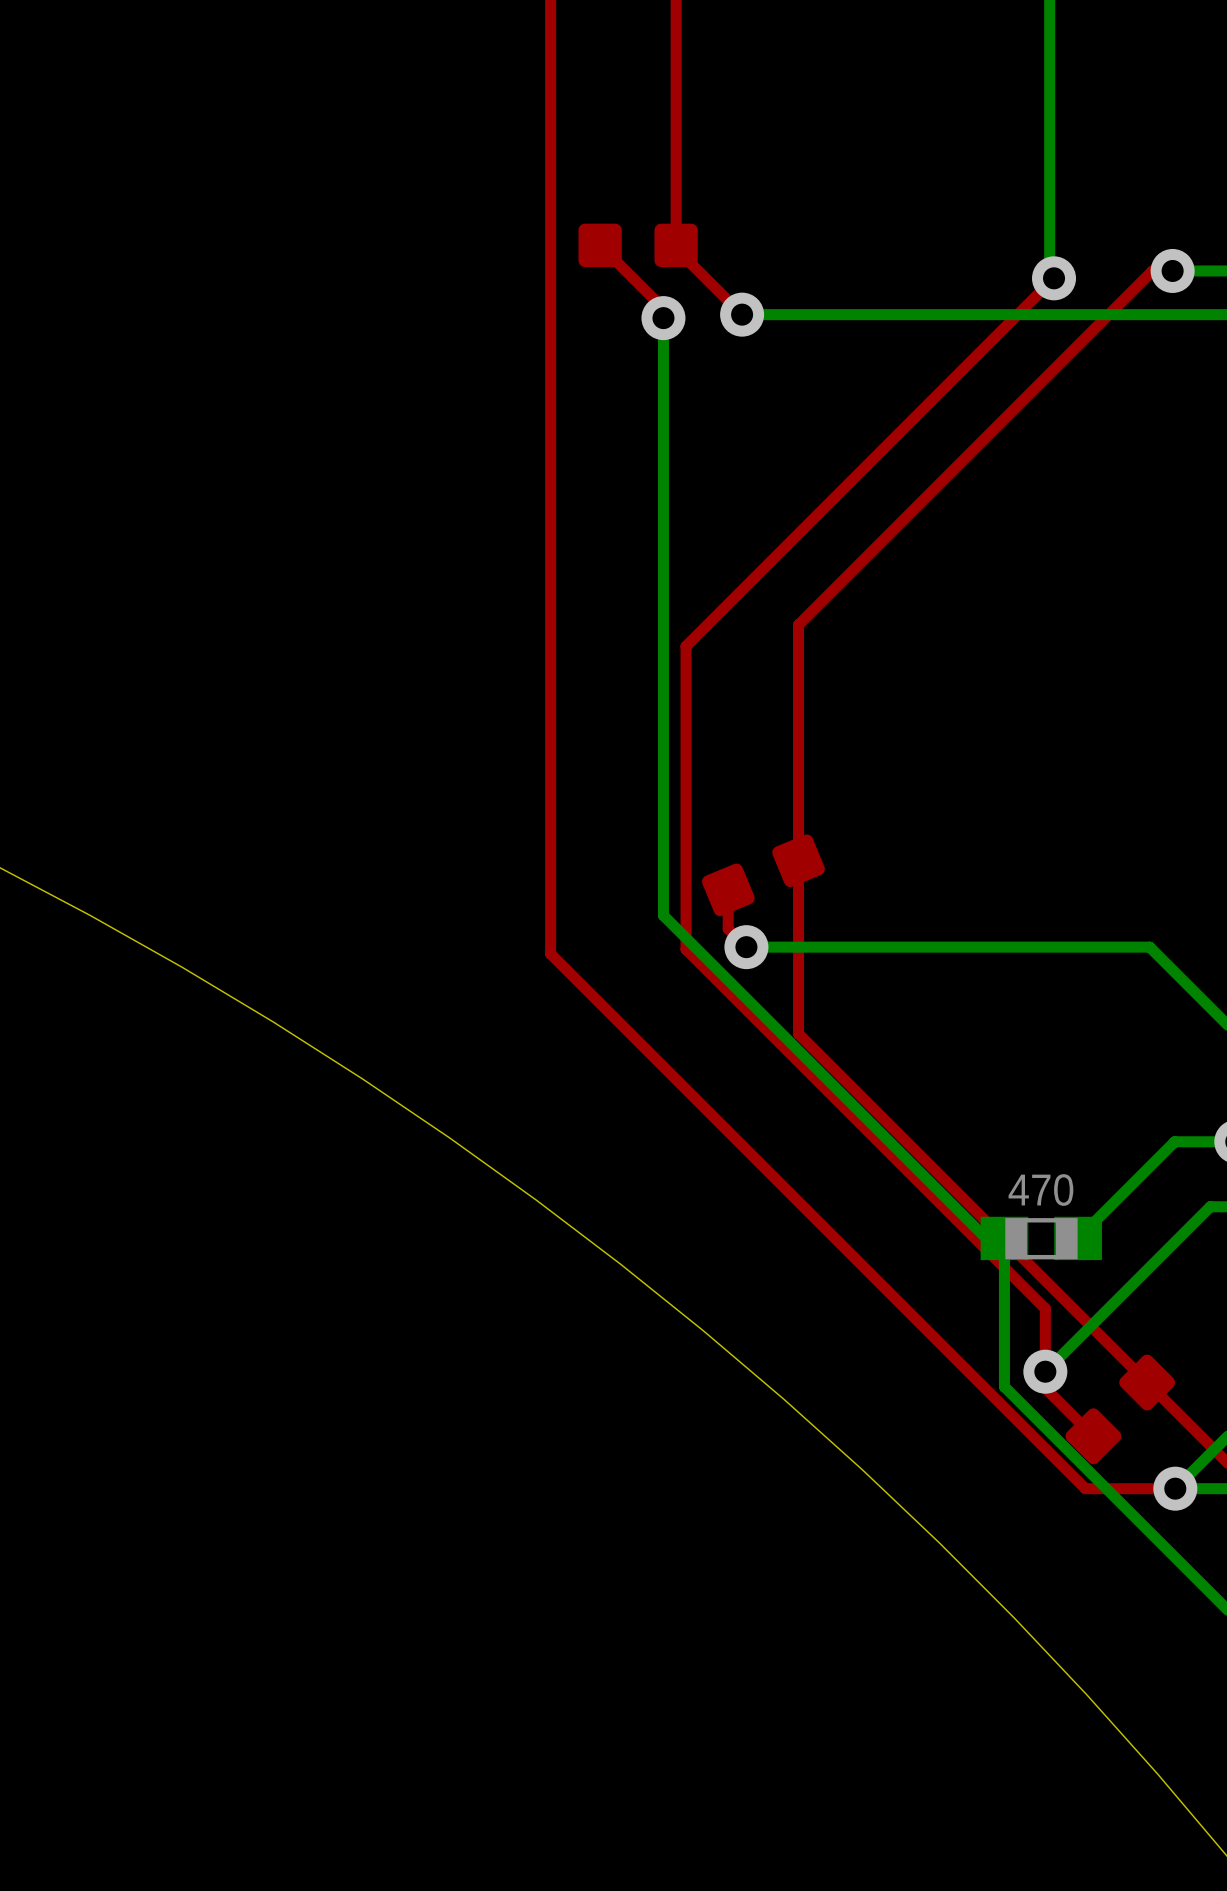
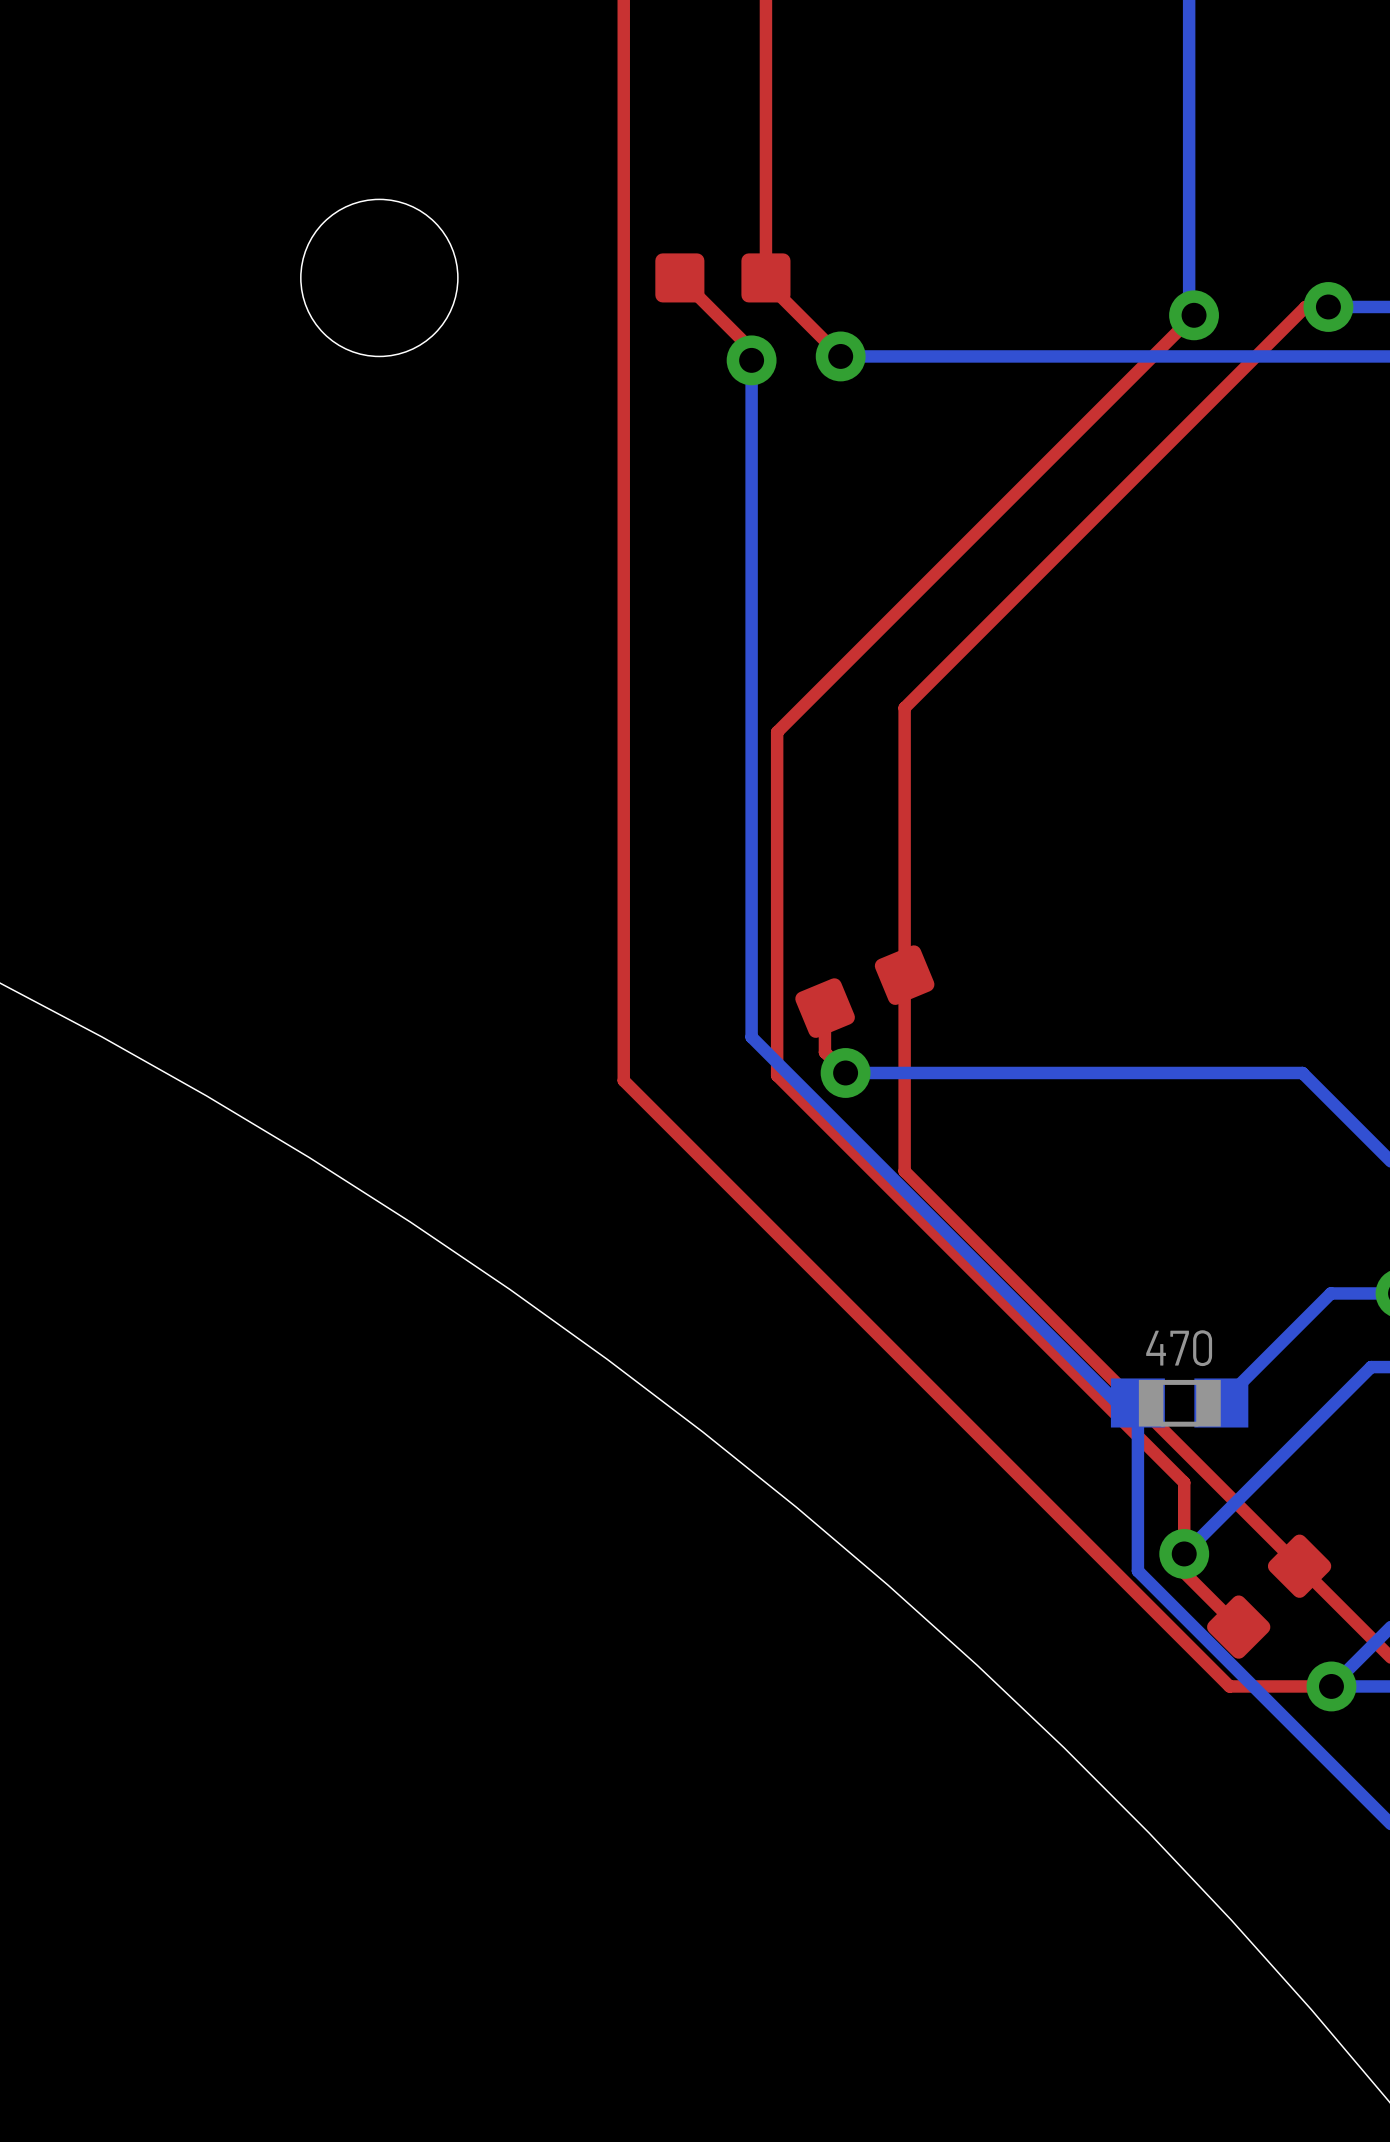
round board edge: none -> [300, 199, 458, 357]

